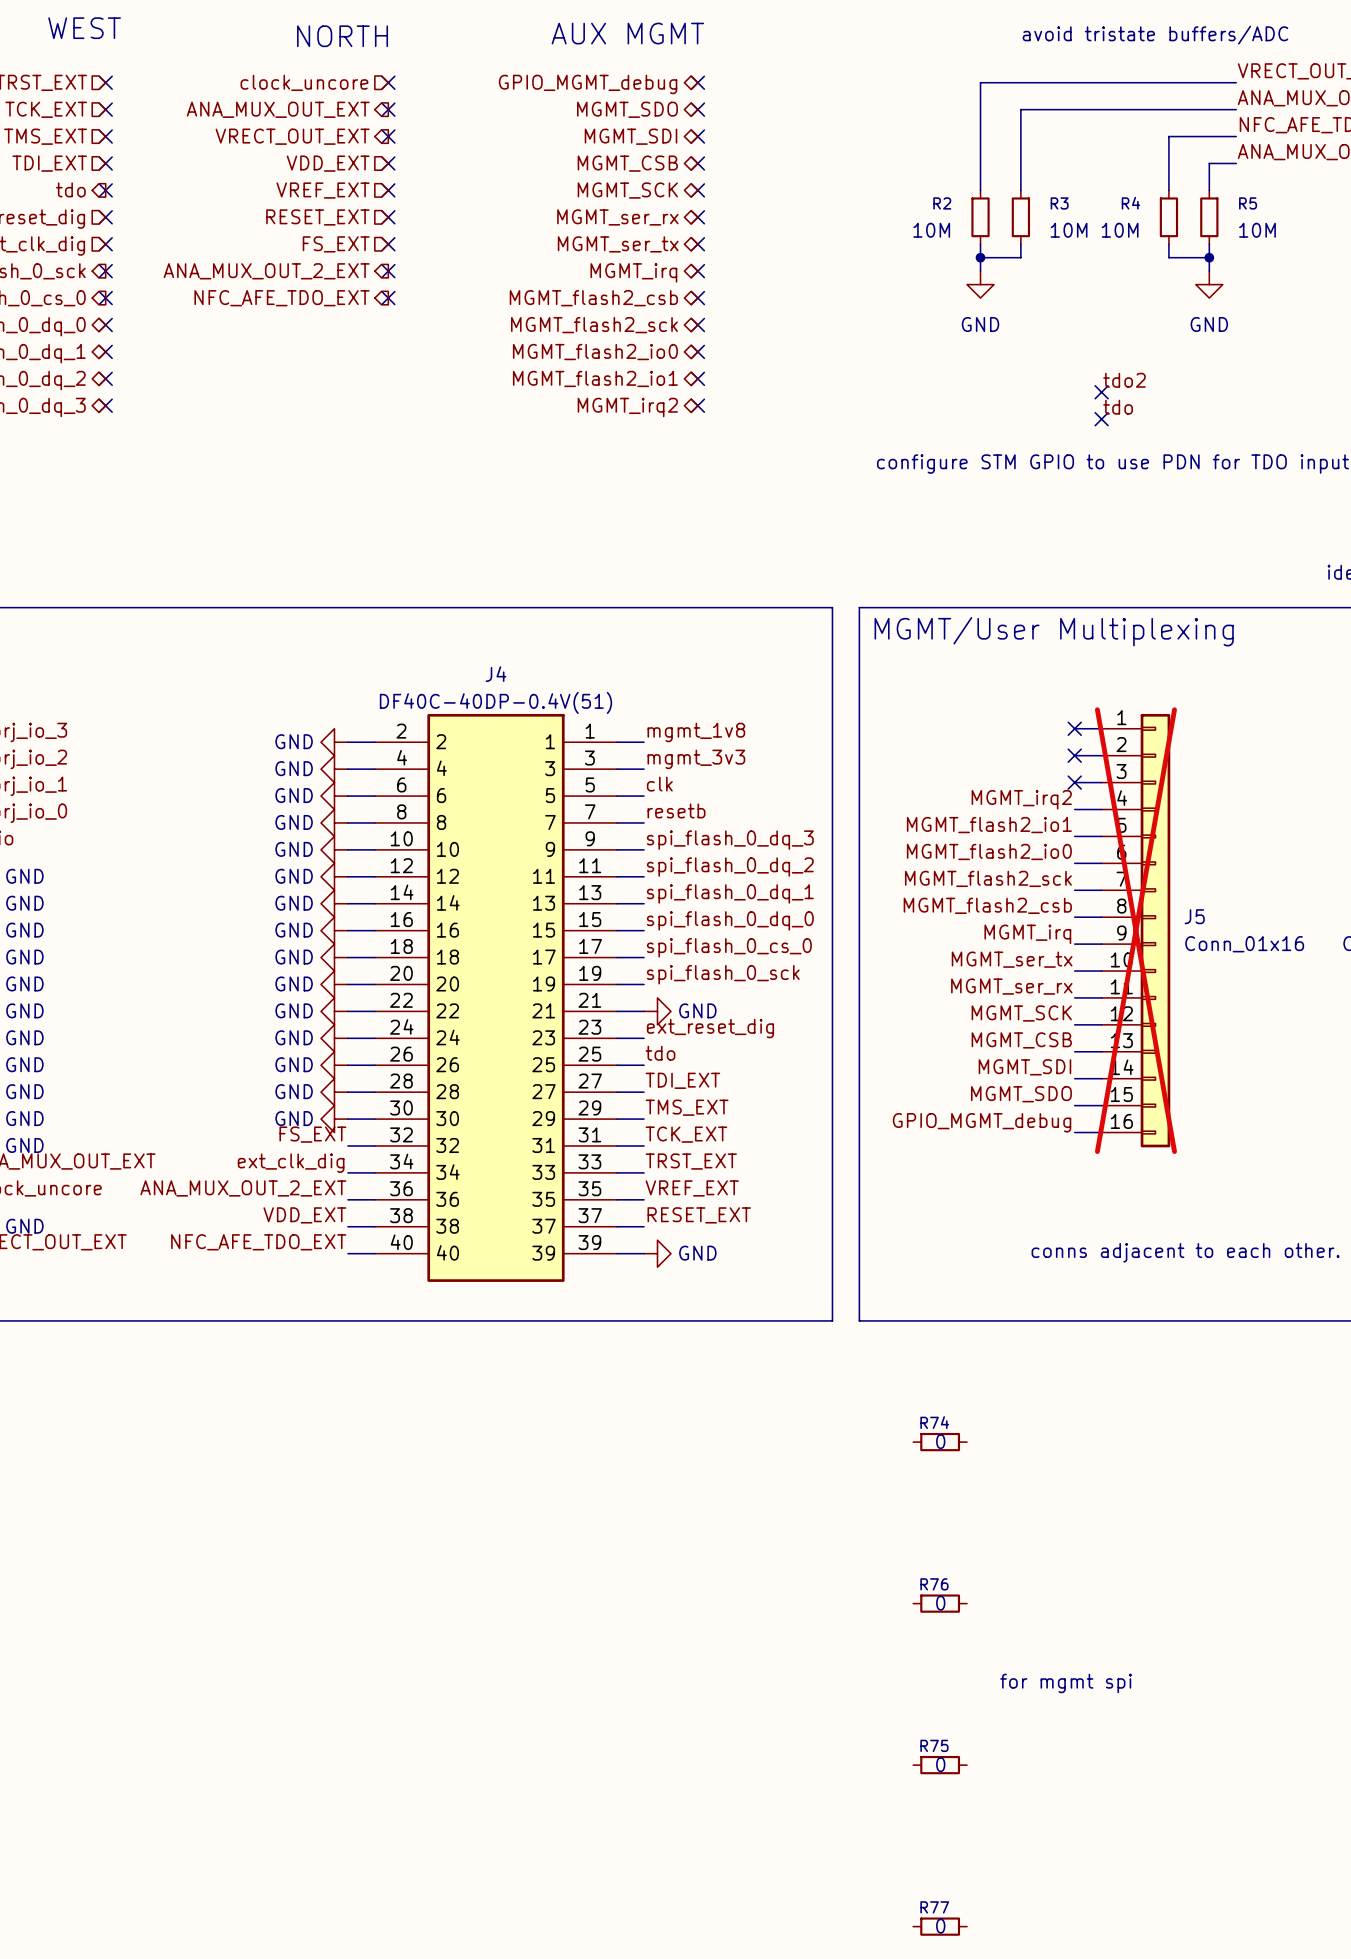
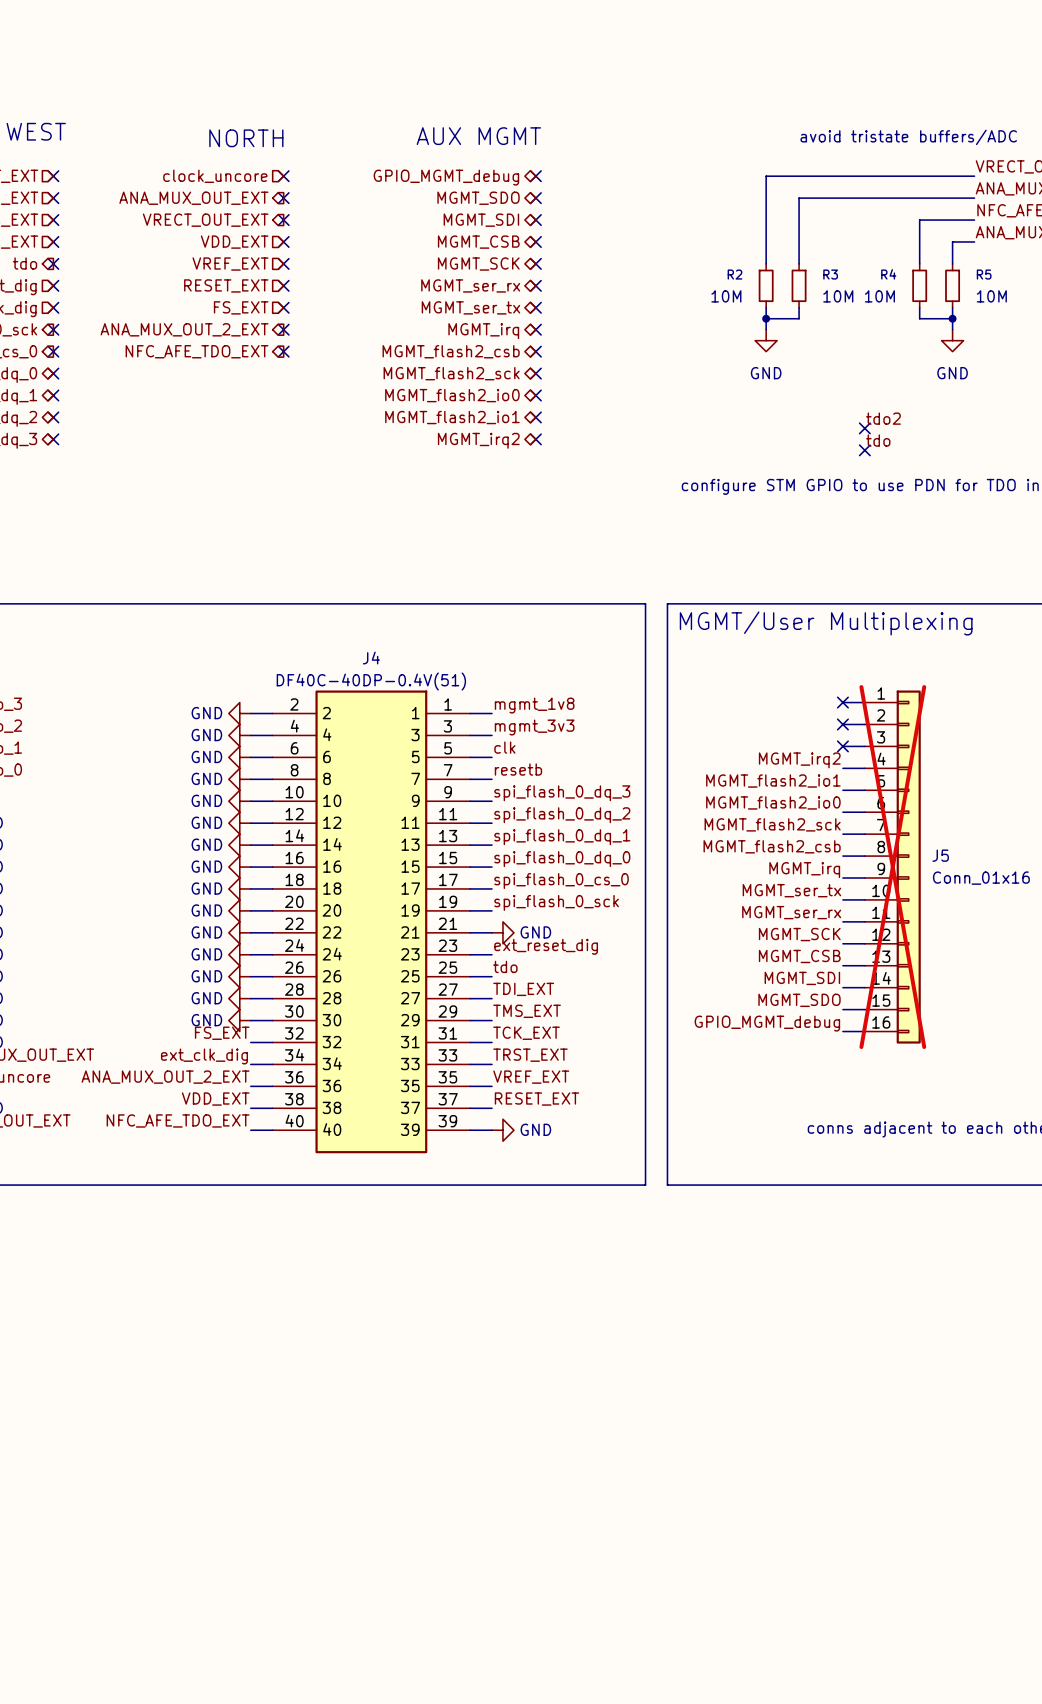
R74: 0 (940, 1442) -> none
R76: 0 (940, 1603) -> none
text: for mgmt spi (1066, 1683) -> none
R75: 0 (940, 1765) -> none
R77: 0 (940, 1926) -> none

